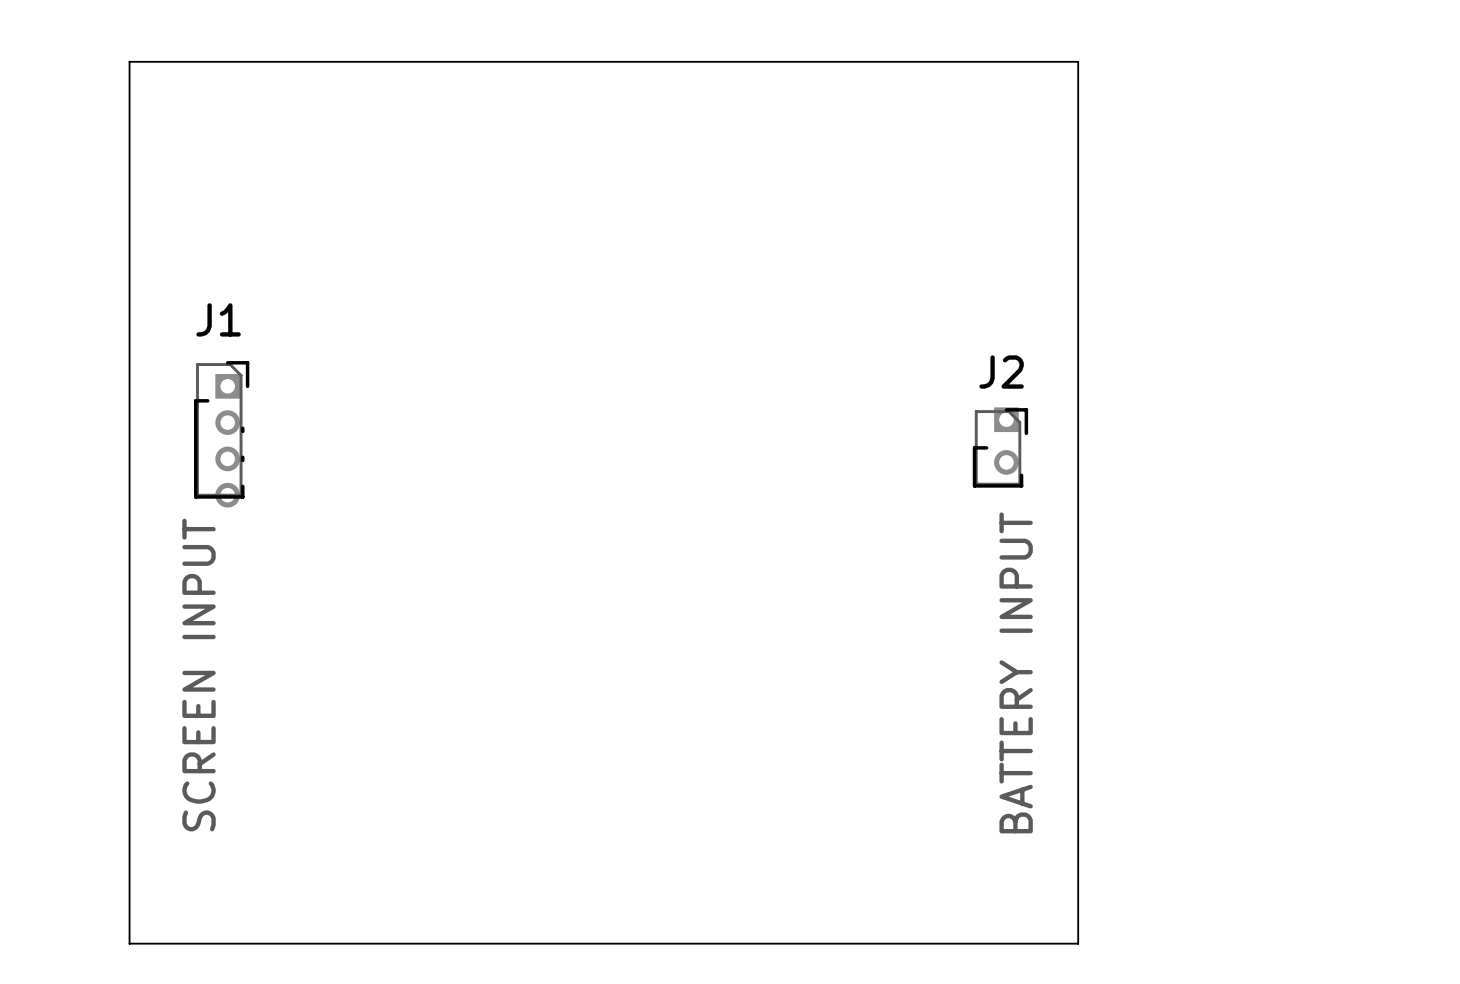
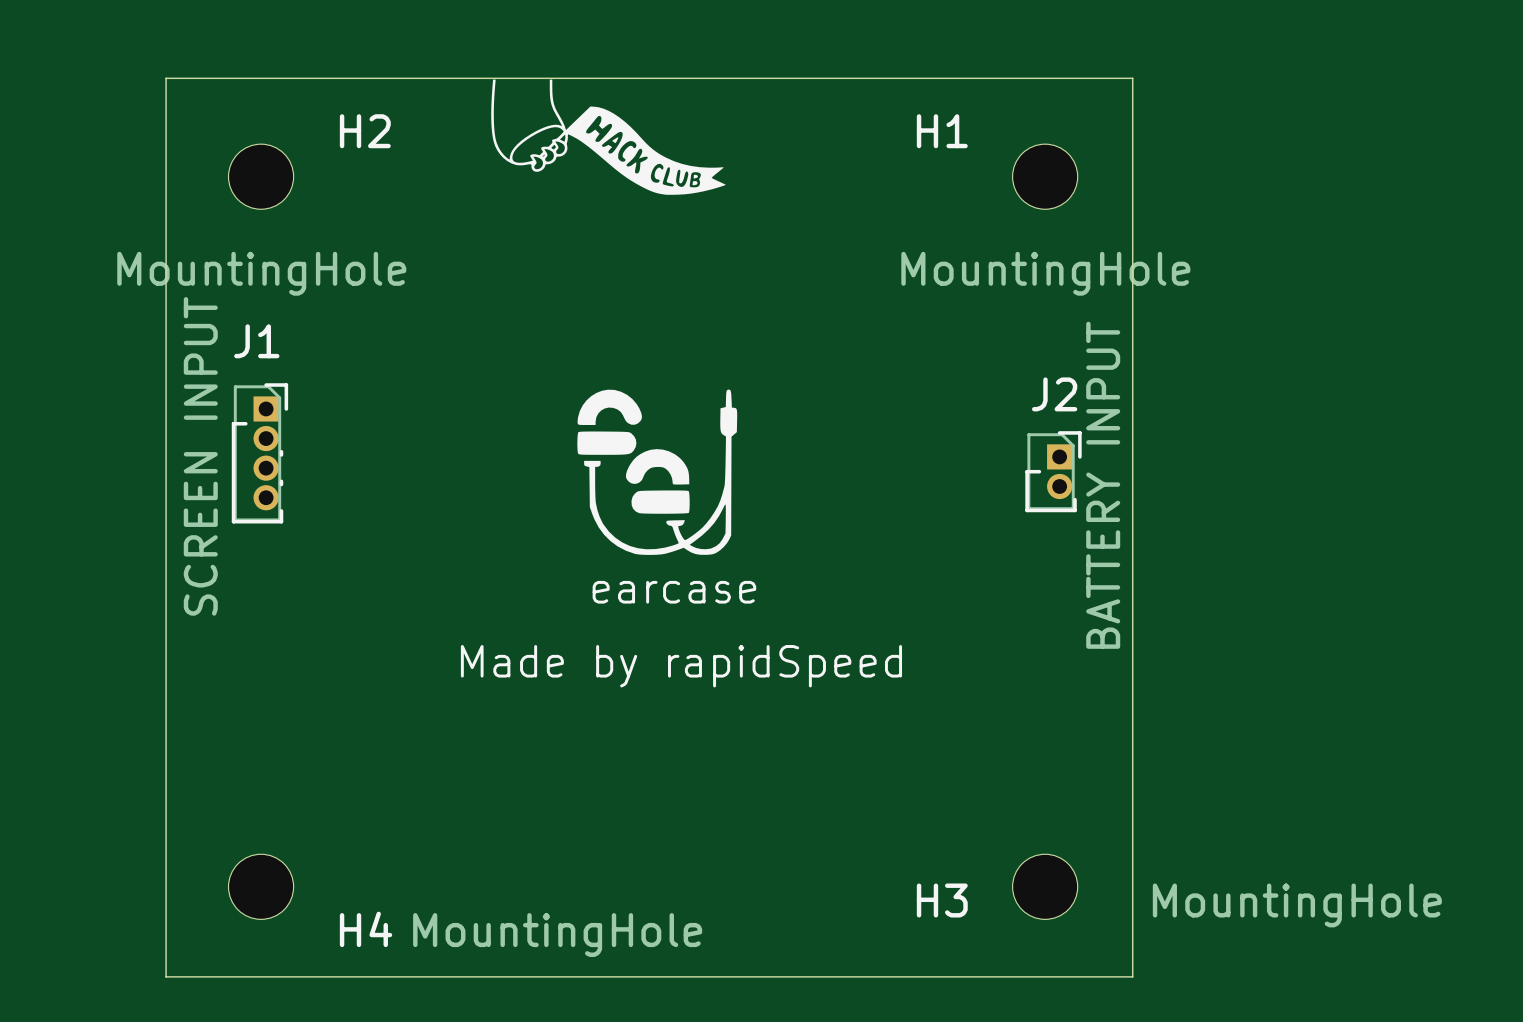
drawing: none -> [491, 79, 726, 195]
H2: none -> MountingHole (261, 176)
H1: none -> MountingHole (1045, 176)
J1 footprint: [194, 361, 250, 508] -> [231, 383, 289, 524]
drawing: none -> [577, 389, 738, 555]
J2 footprint: [972, 407, 1029, 488] -> [1025, 431, 1082, 513]
text: none -> earcase (674, 592)
text: none -> Made by rapidSpeed (681, 666)
J2 value position: BATTERY INPUT (1016, 672) -> BATTERY INPUT (1103, 485)
J1 value position: SCREEN INPUT (199, 675) -> SCREEN INPUT (200, 456)
H4: none -> MountingHole (261, 886)
H3: none -> MountingHole (1045, 886)

